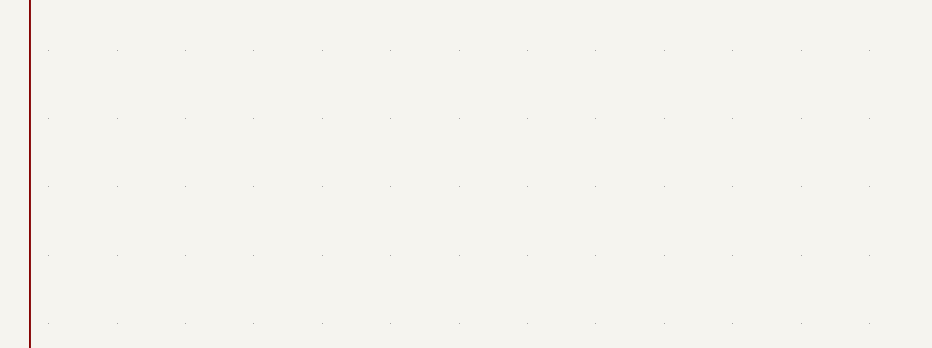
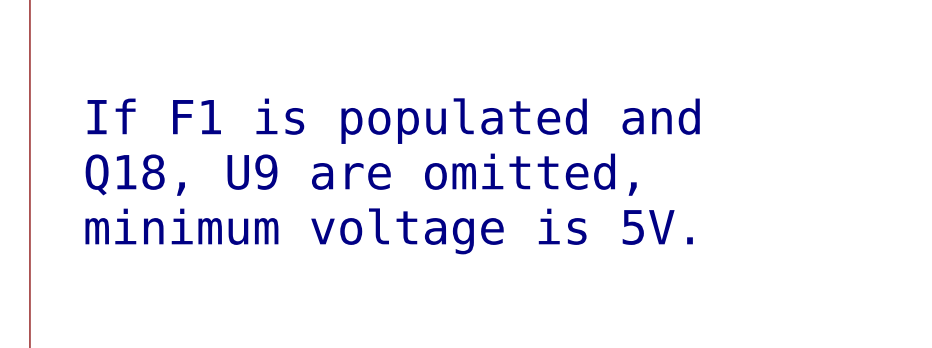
text: none -> If F1 is populated and (393, 121)
text: none -> Q18, U9 are omitted, (361, 174)
text: none -> minimum voltage is 5V. (389, 231)

